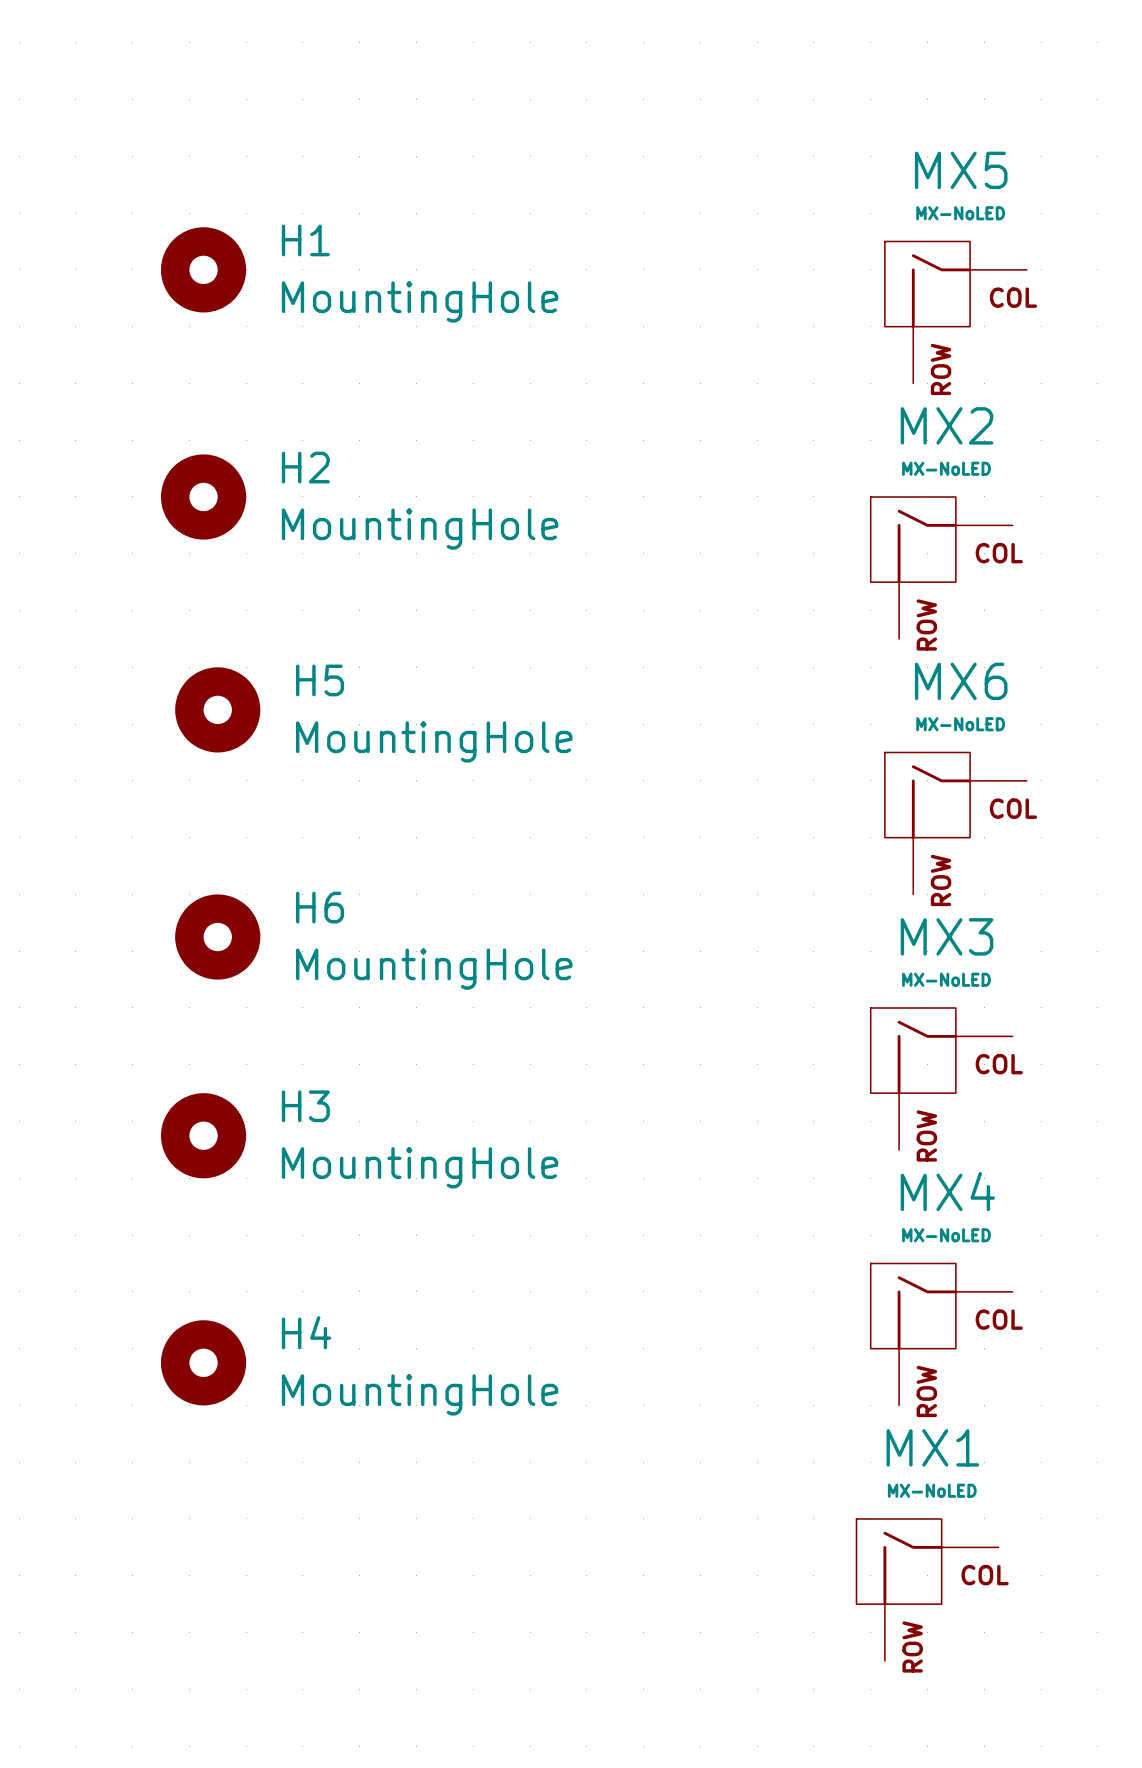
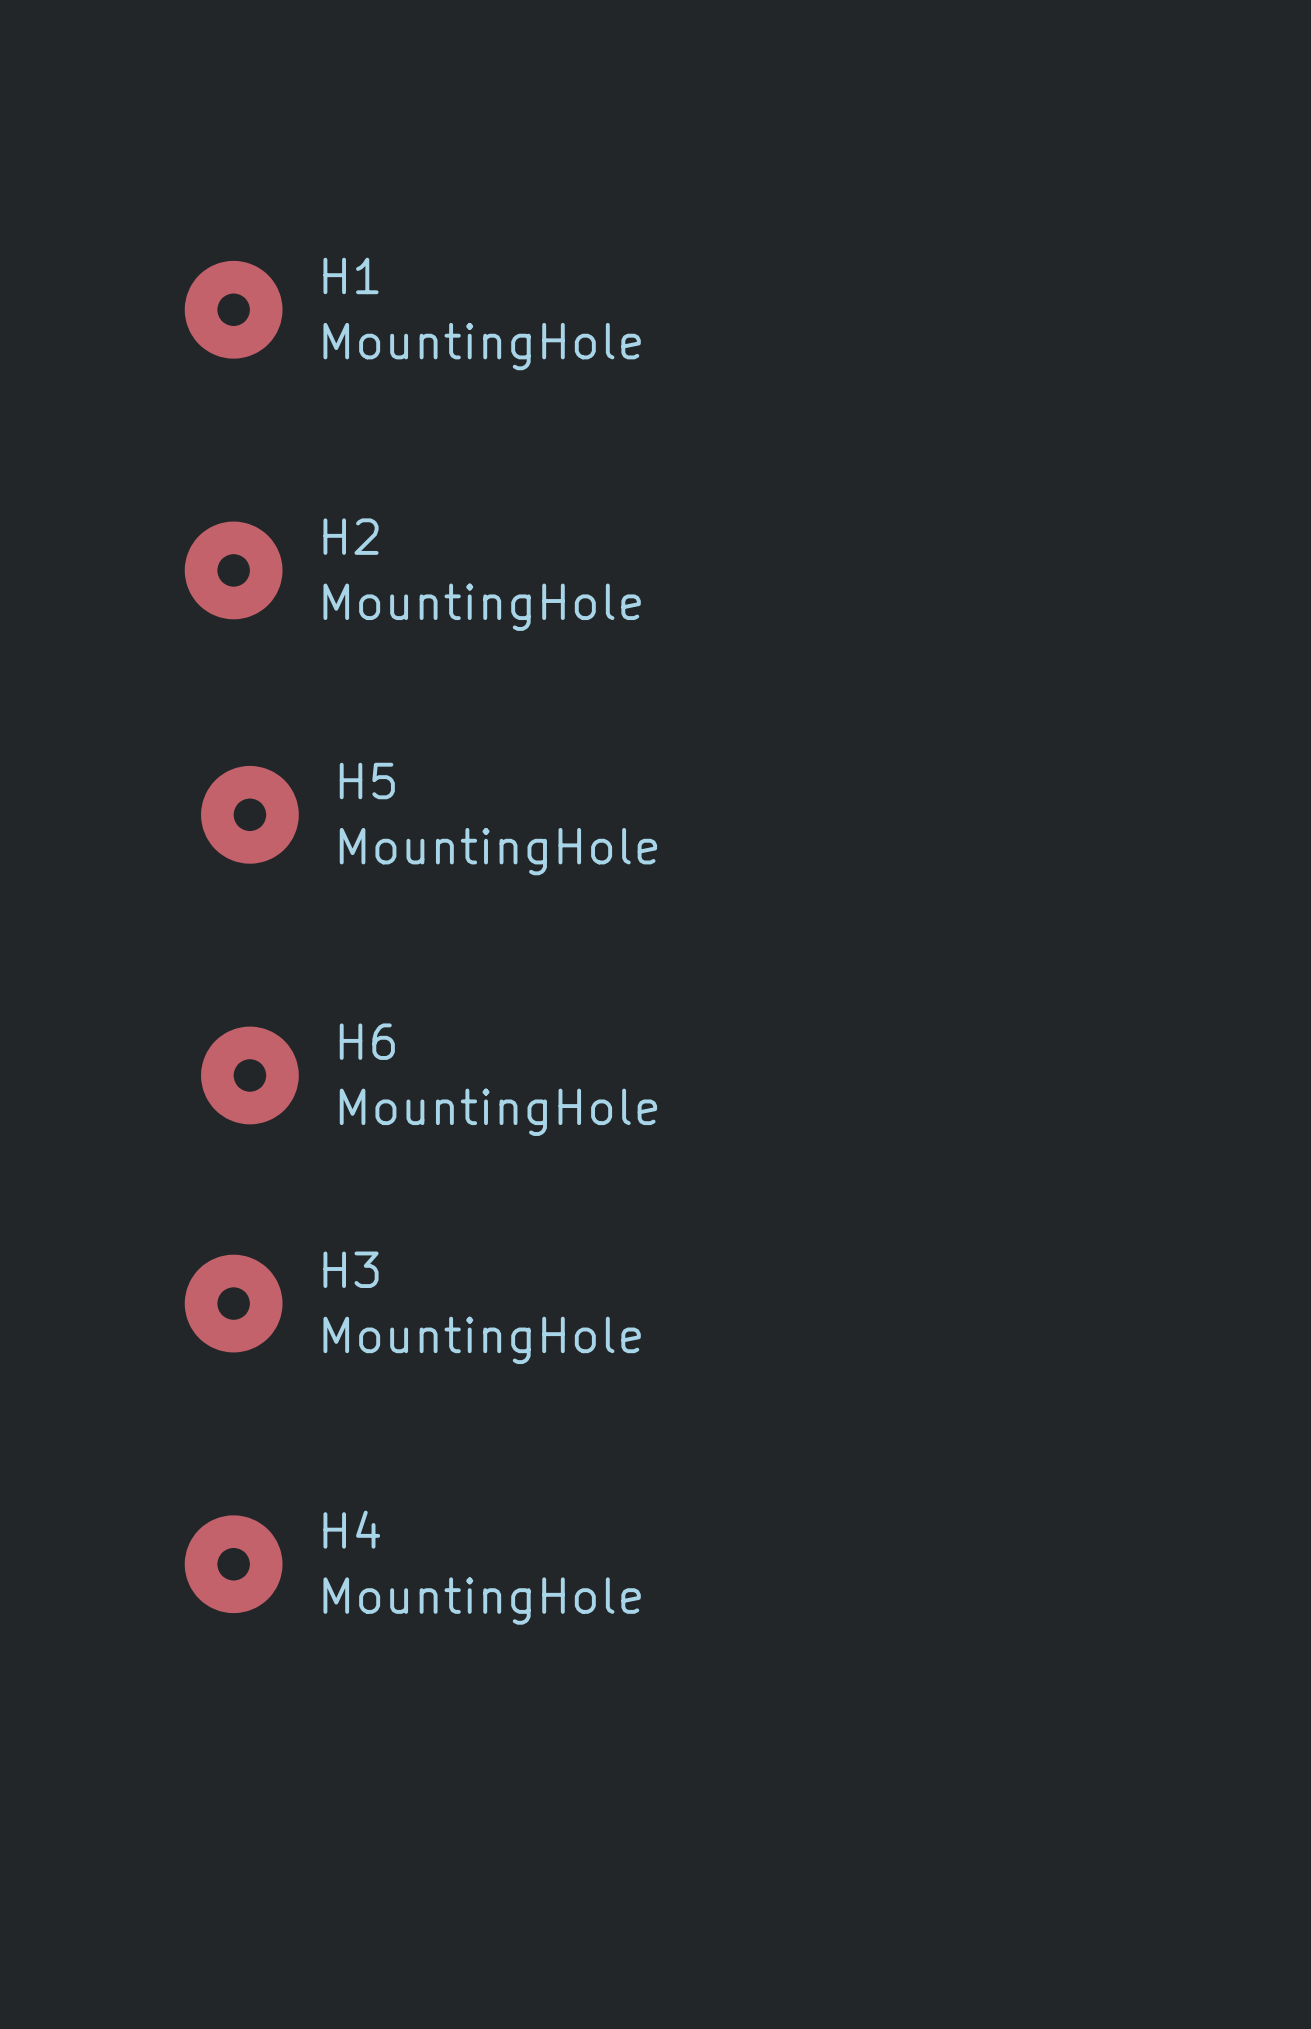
MX5: MX-NoLED (955, 312) -> none
MX2: MX-NoLED (941, 567) -> none
MX6: MX-NoLED (955, 823) -> none
MX3: MX-NoLED (941, 1078) -> none
MX4: MX-NoLED (941, 1334) -> none
MX1: MX-NoLED (927, 1589) -> none

